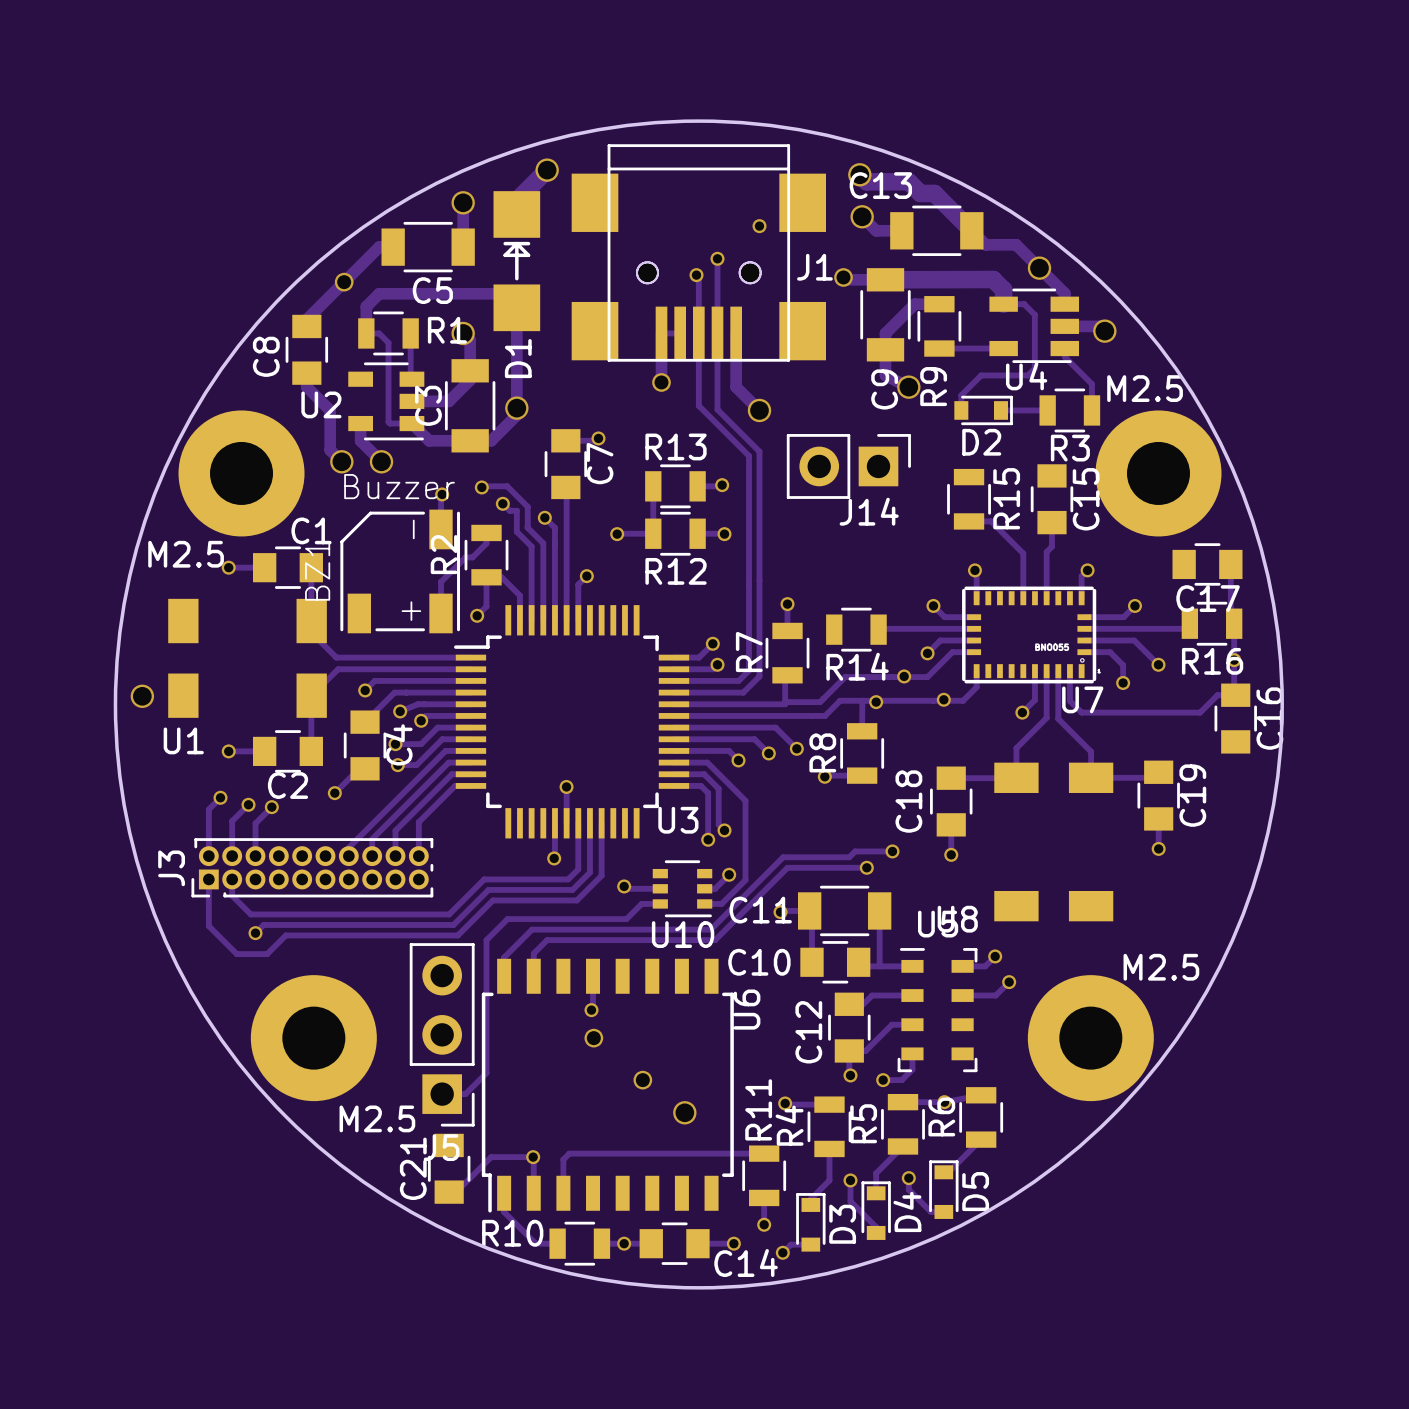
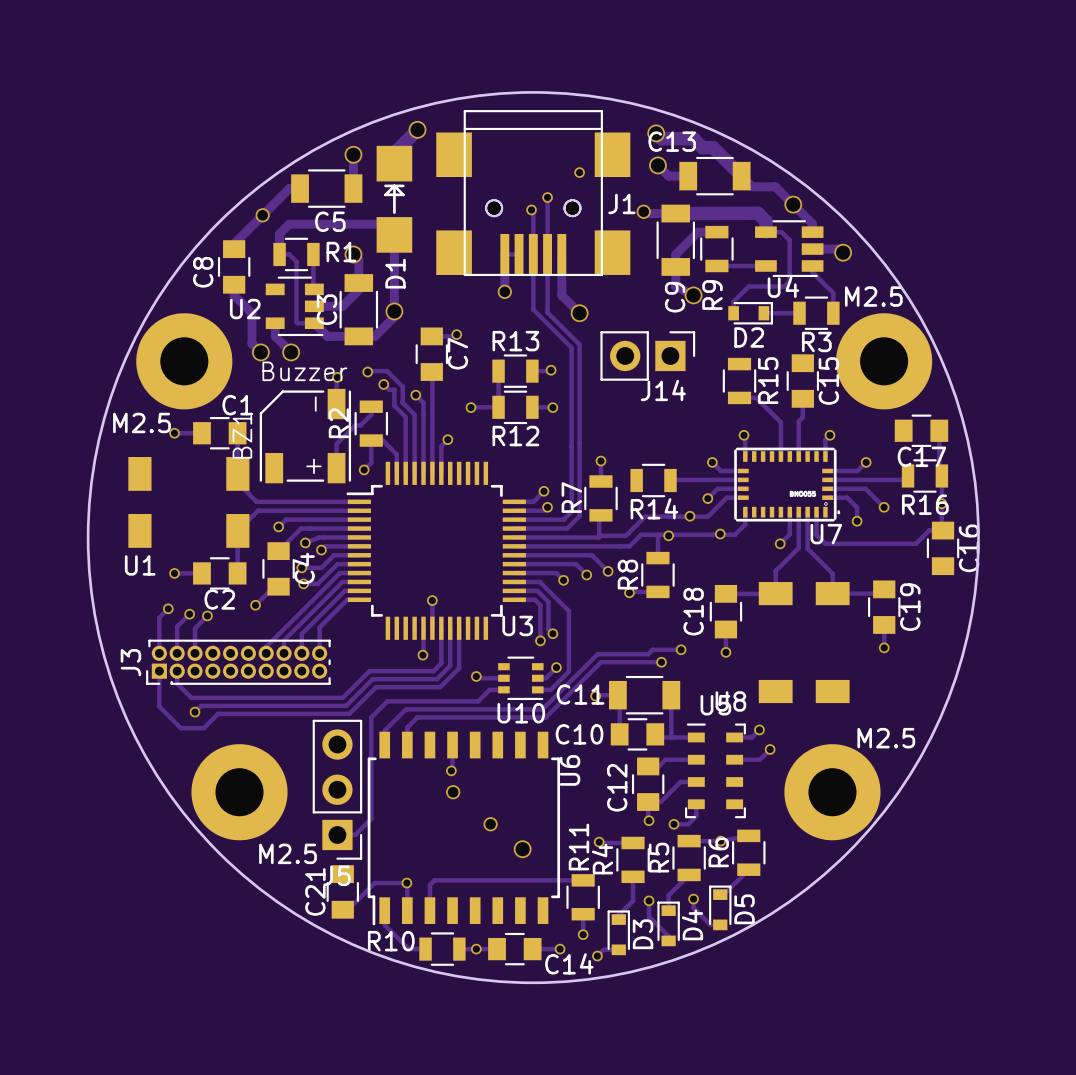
via: (142, 696) -> none

